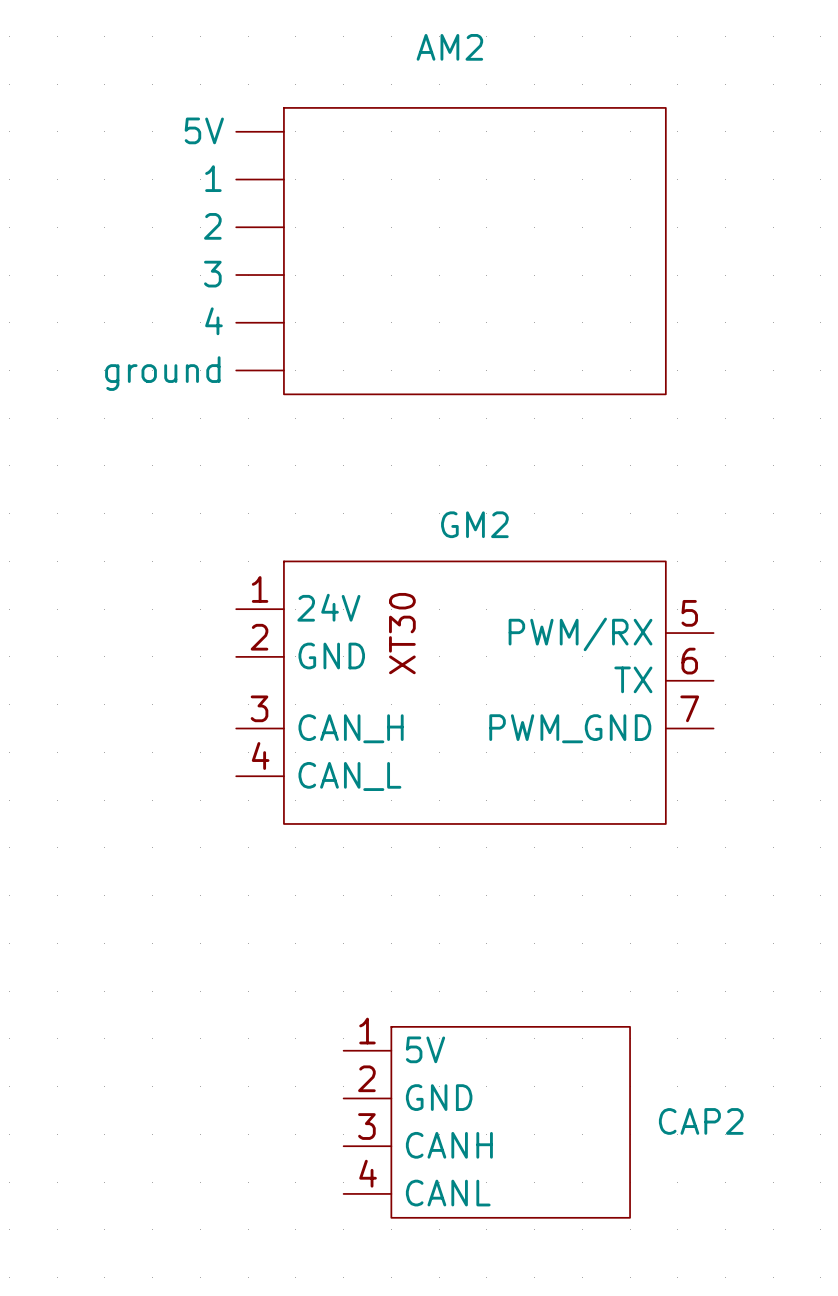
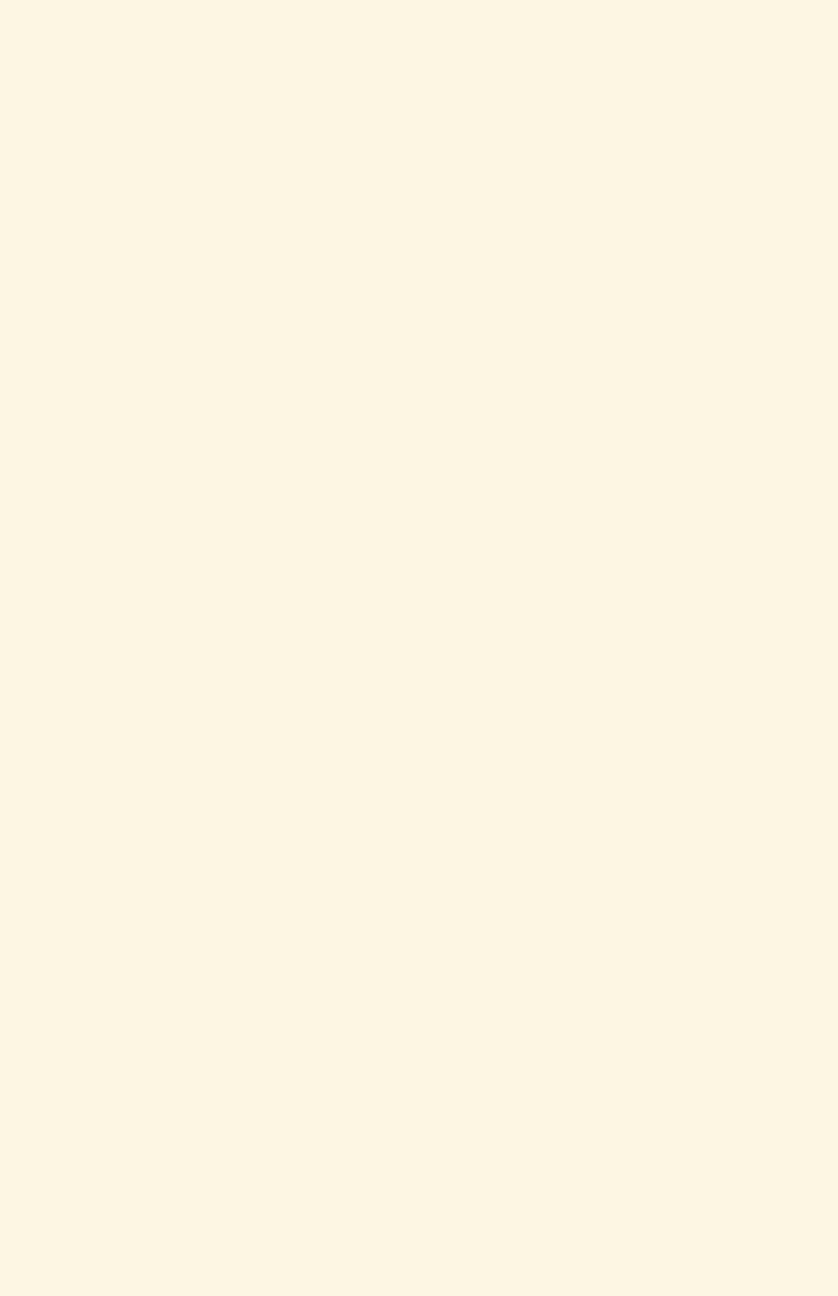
AM2: (451, 239) -> none
GM2: (474, 692) -> none
CAP2: (486, 1122) -> none

